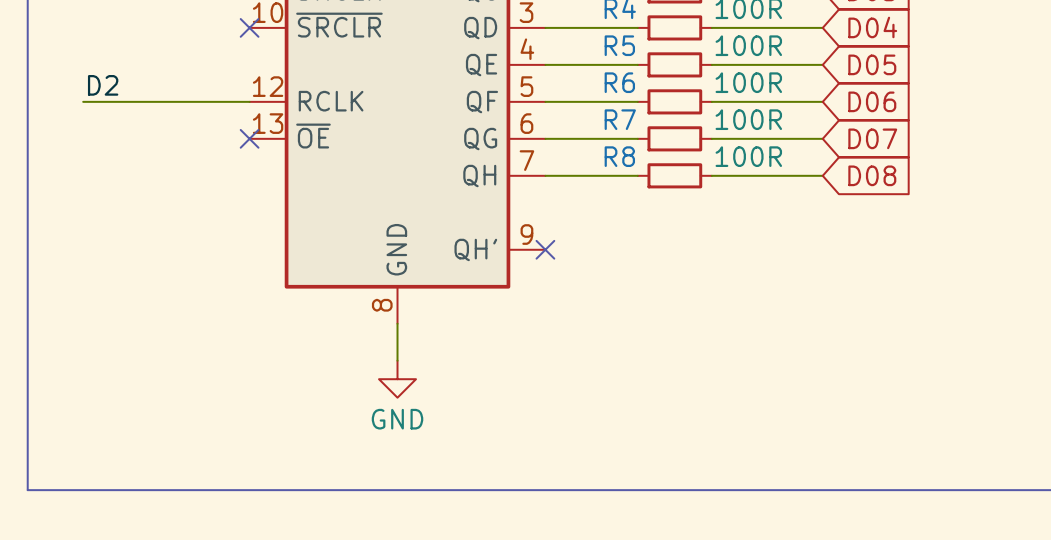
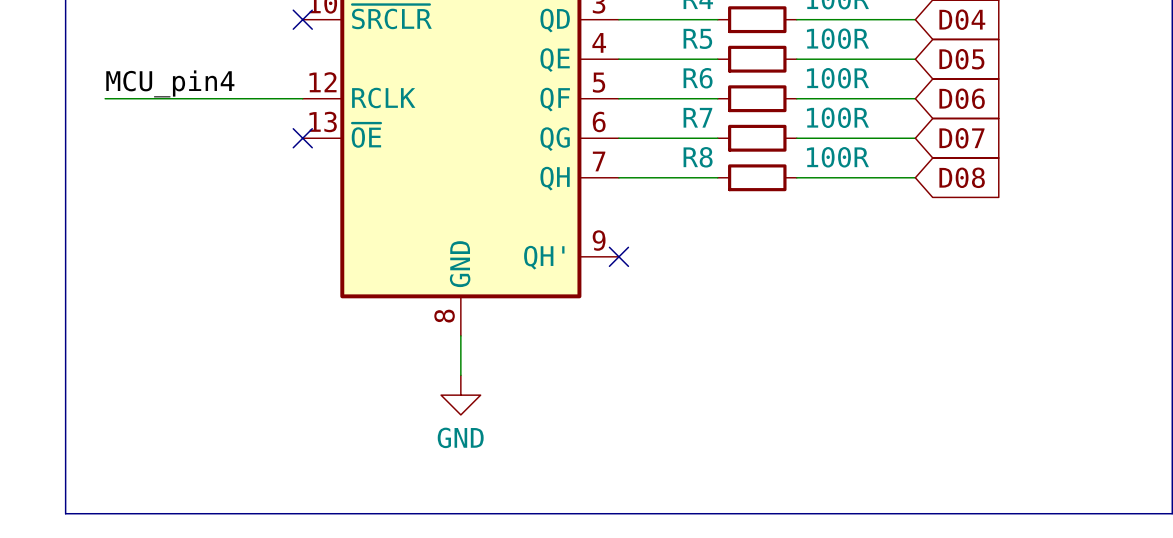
label: D2 (103, 85) -> none
label: none -> MCU_pin4 (170, 83)
wire: none -> (105, 98) (124, 98)

